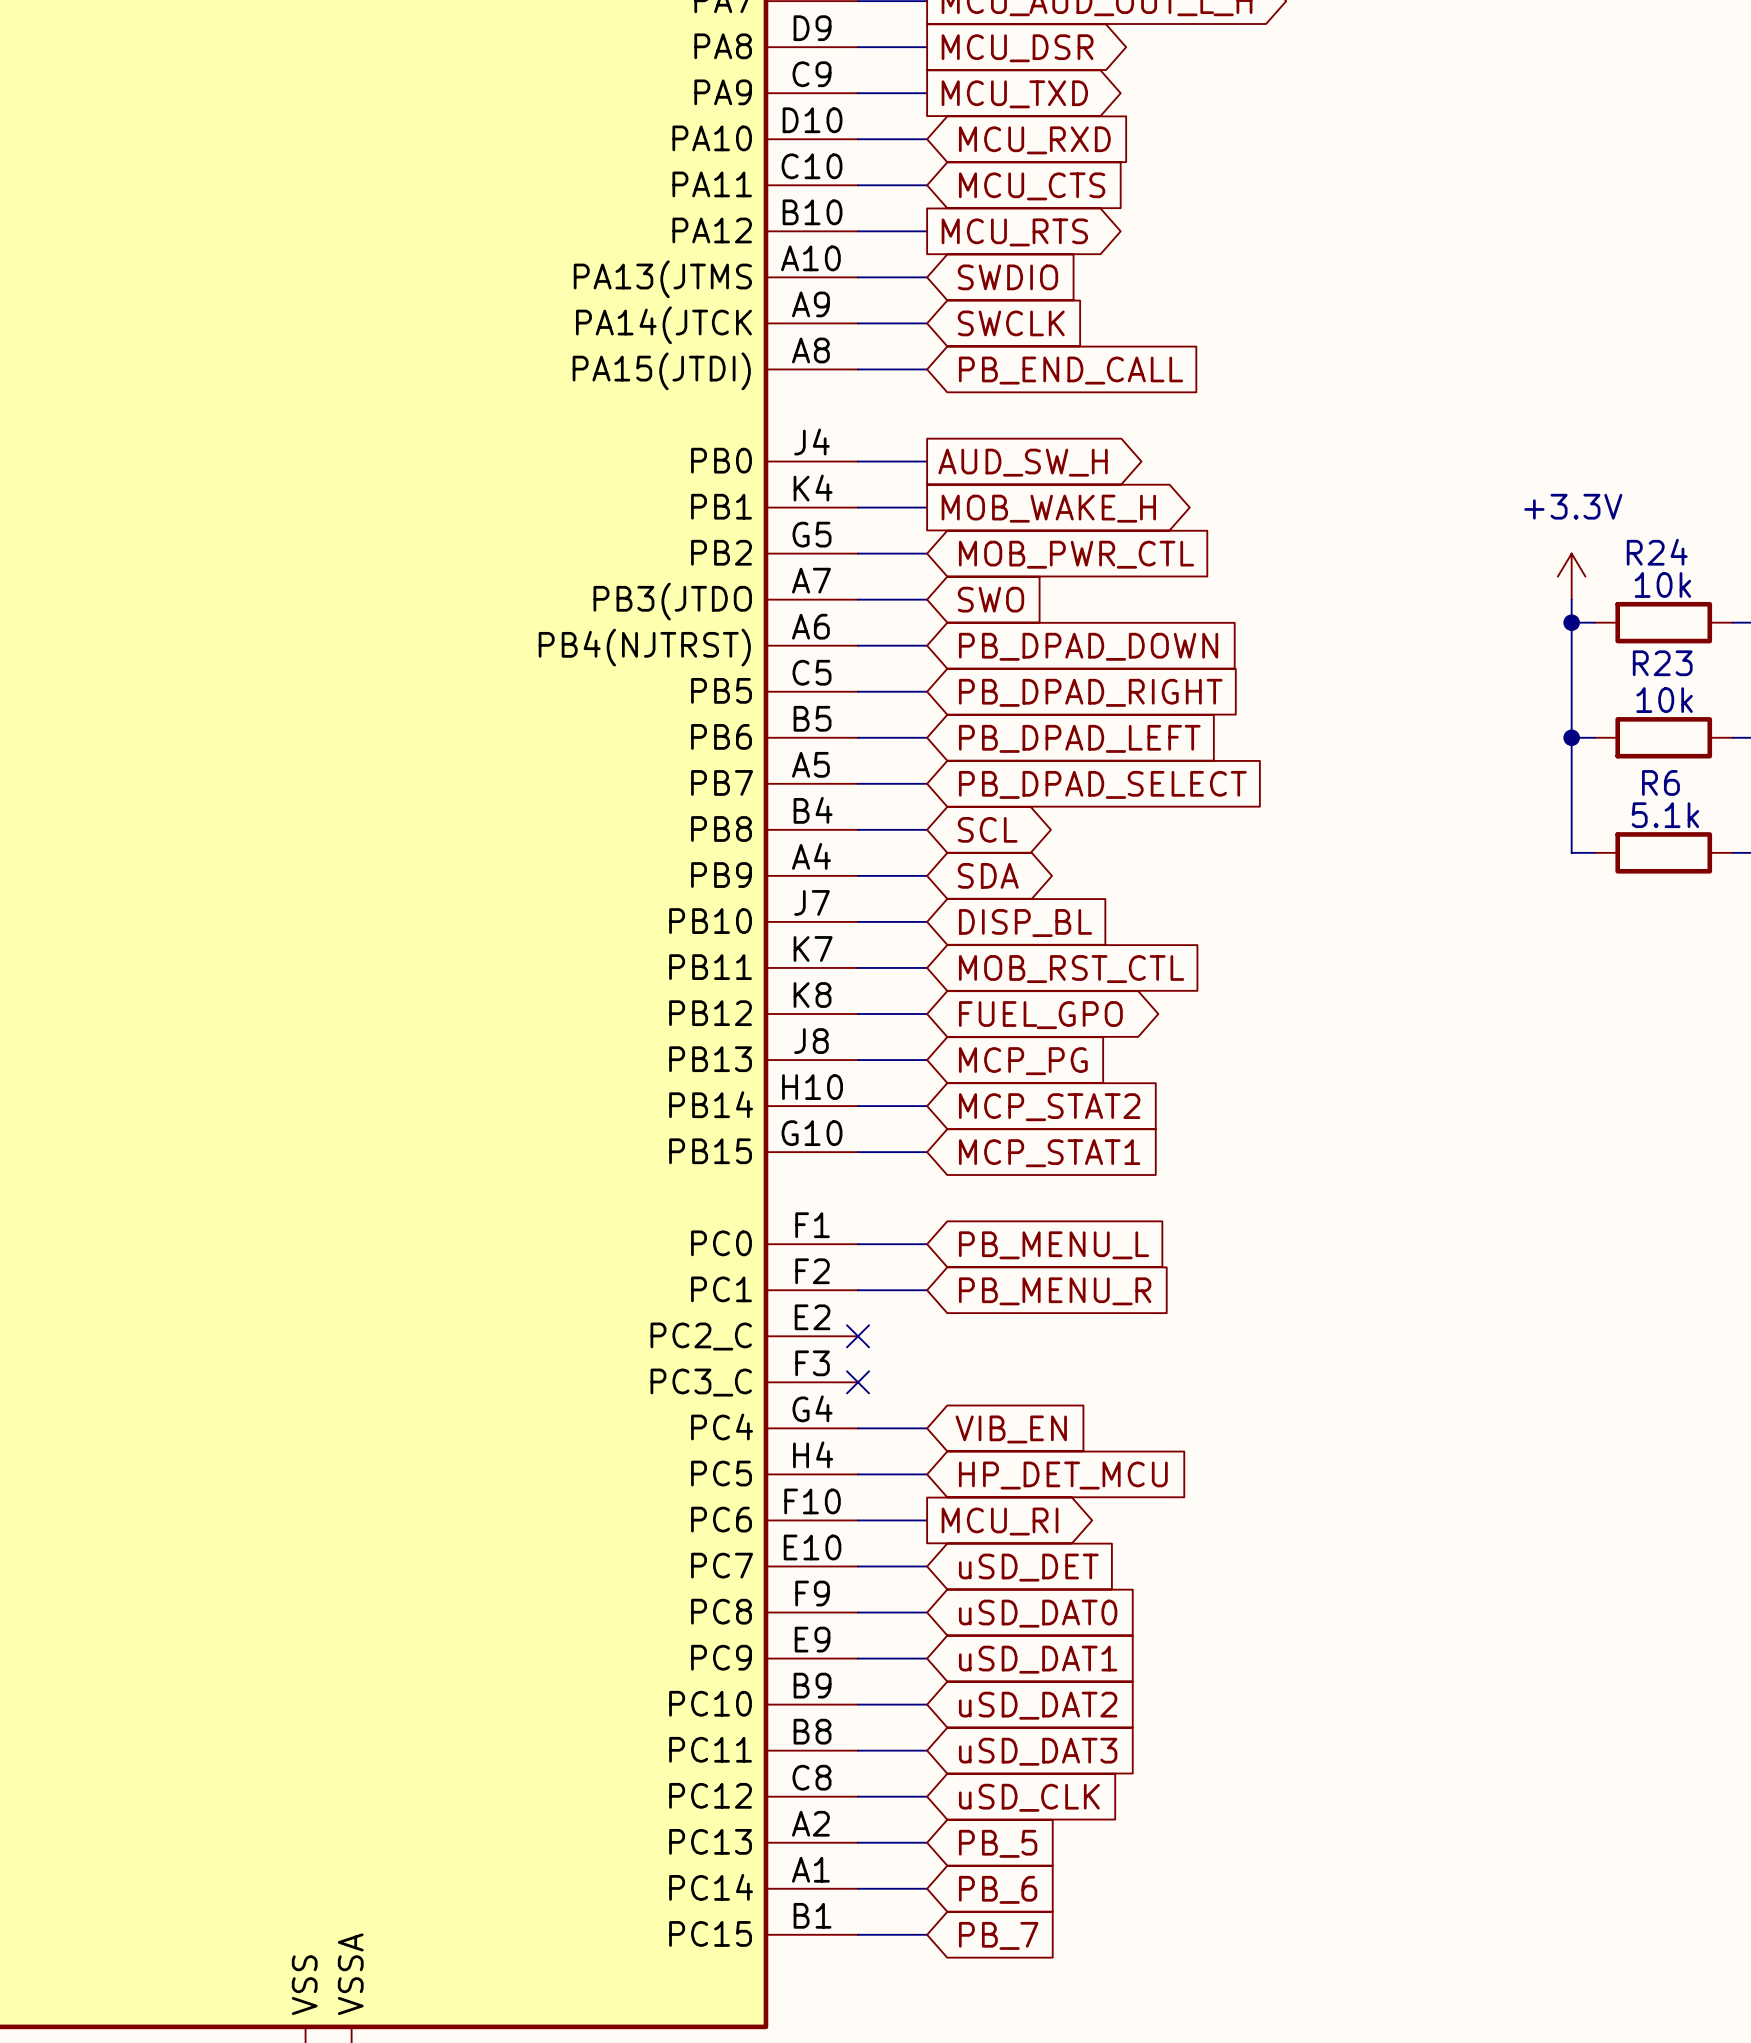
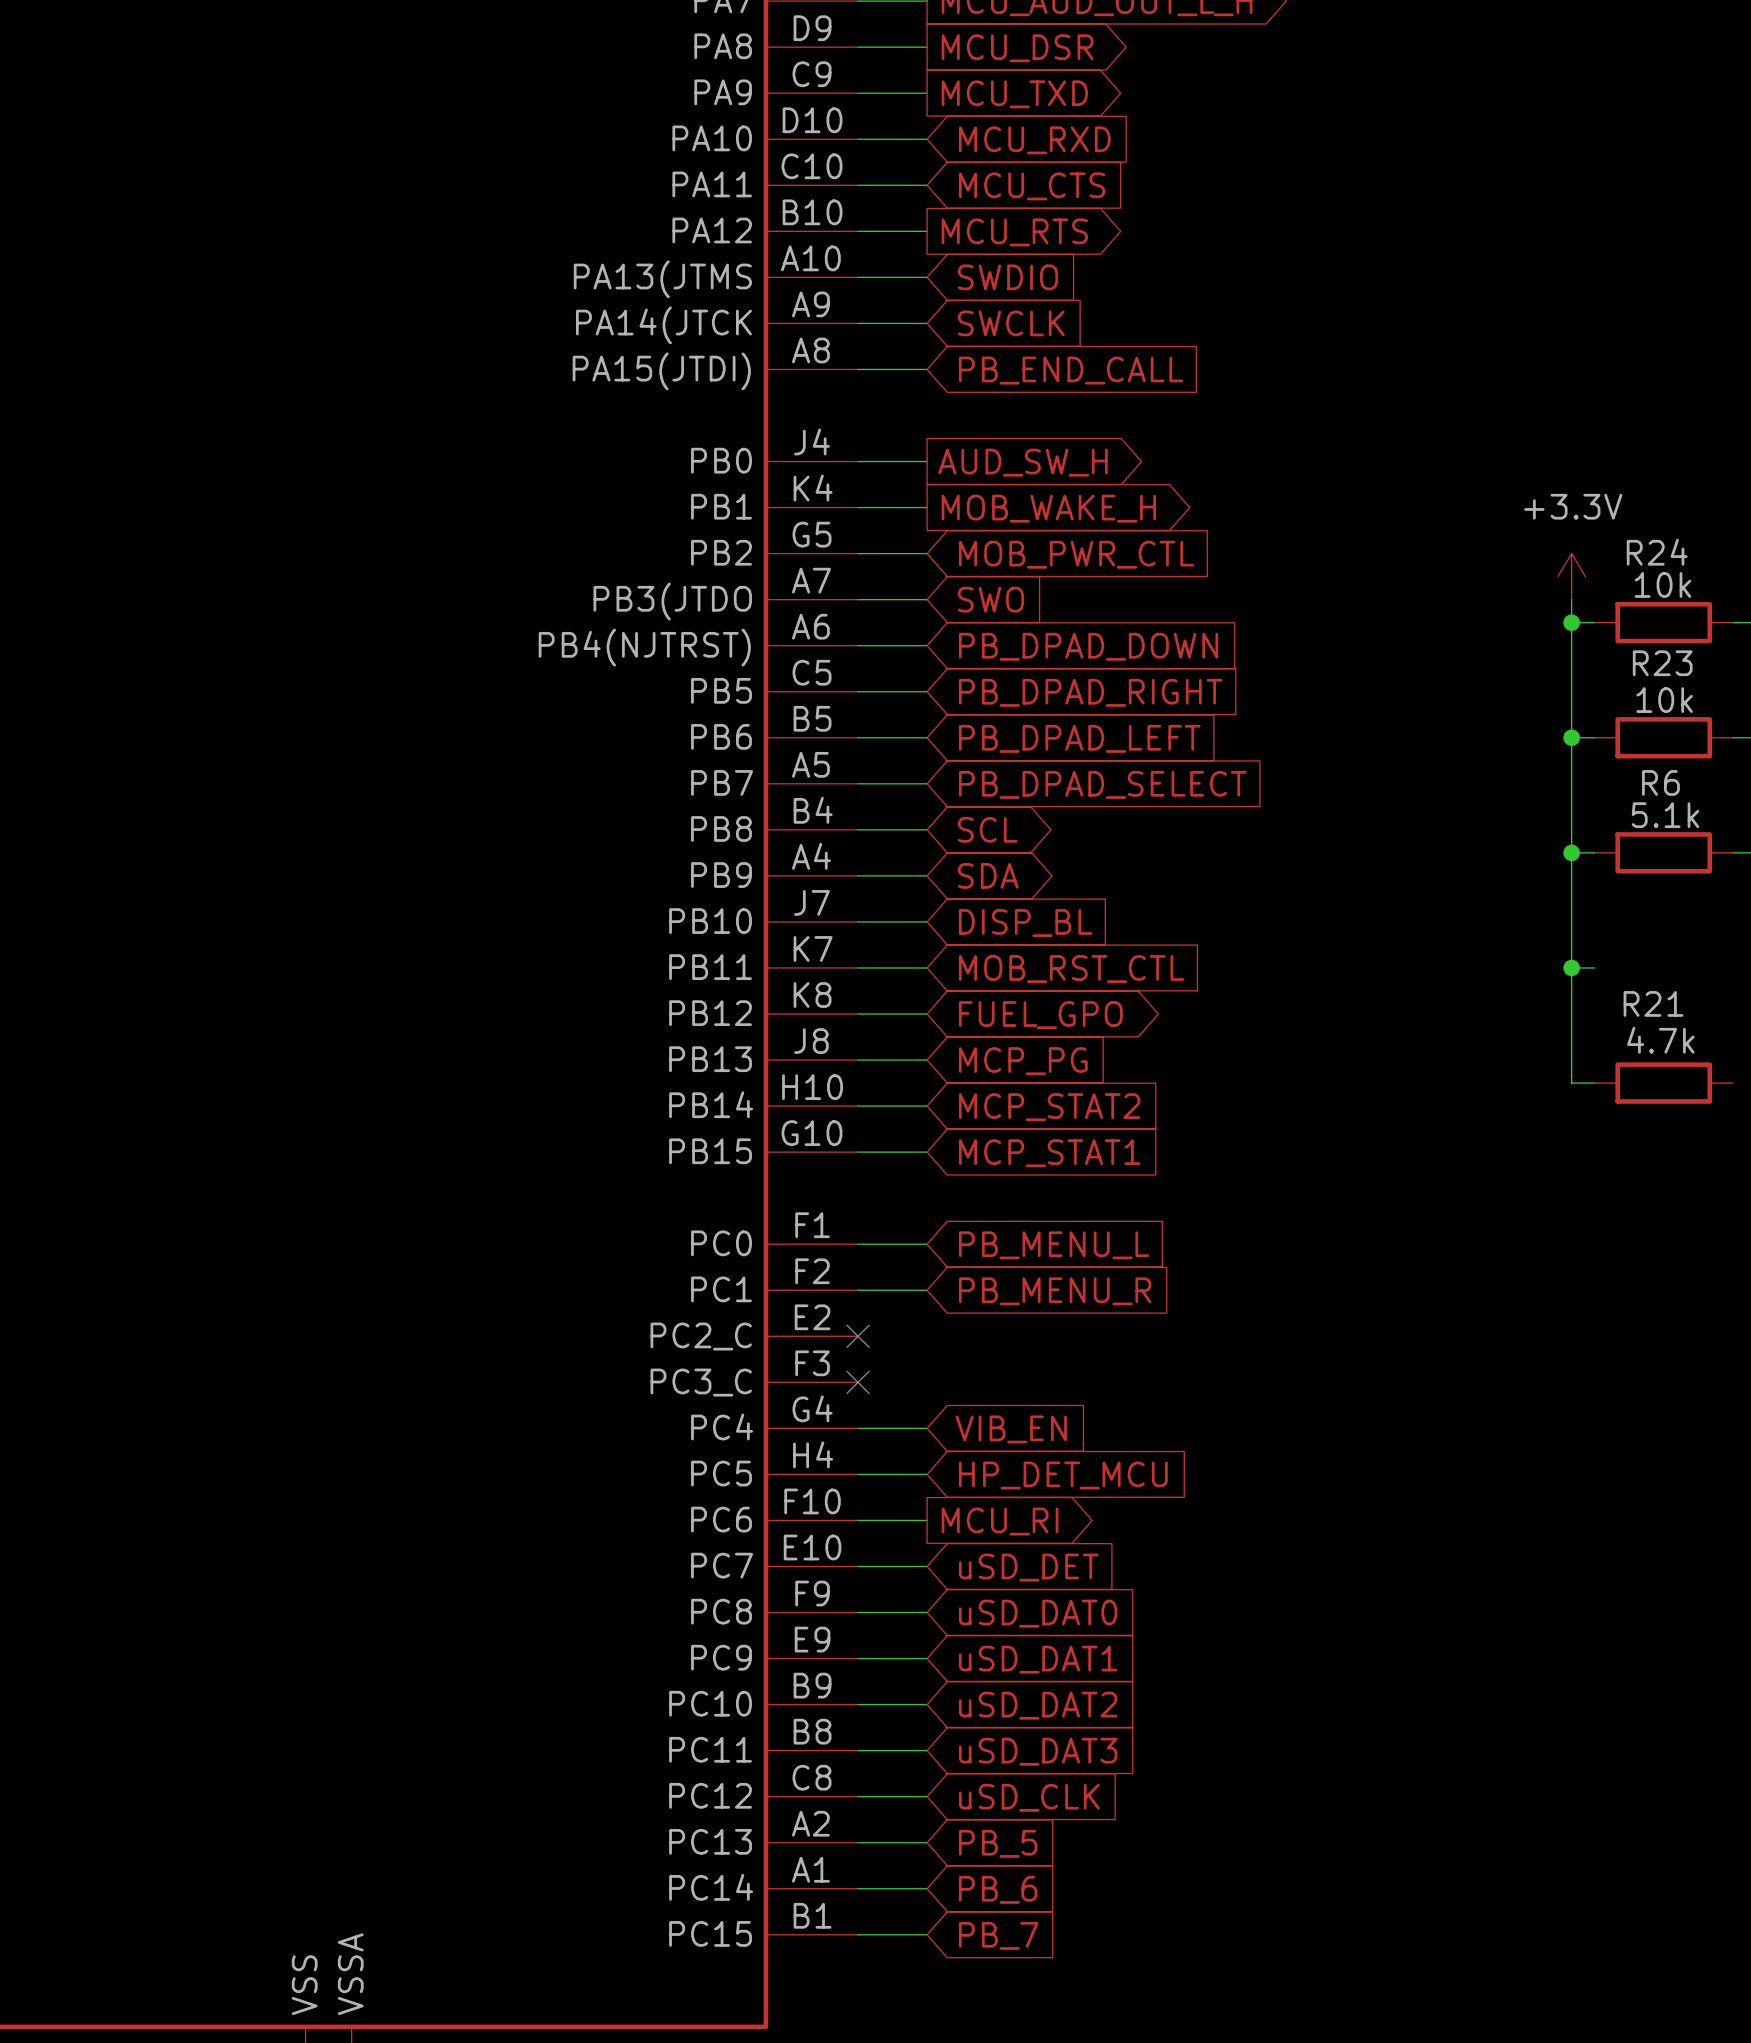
wire: none -> (1571, 852) (1571, 1083) (1594, 1083)
junction: none -> (1571, 852)
wire: none -> (1571, 967) (1594, 967)
junction: none -> (1571, 967)
R21: none -> 4.7k (1663, 1083)

